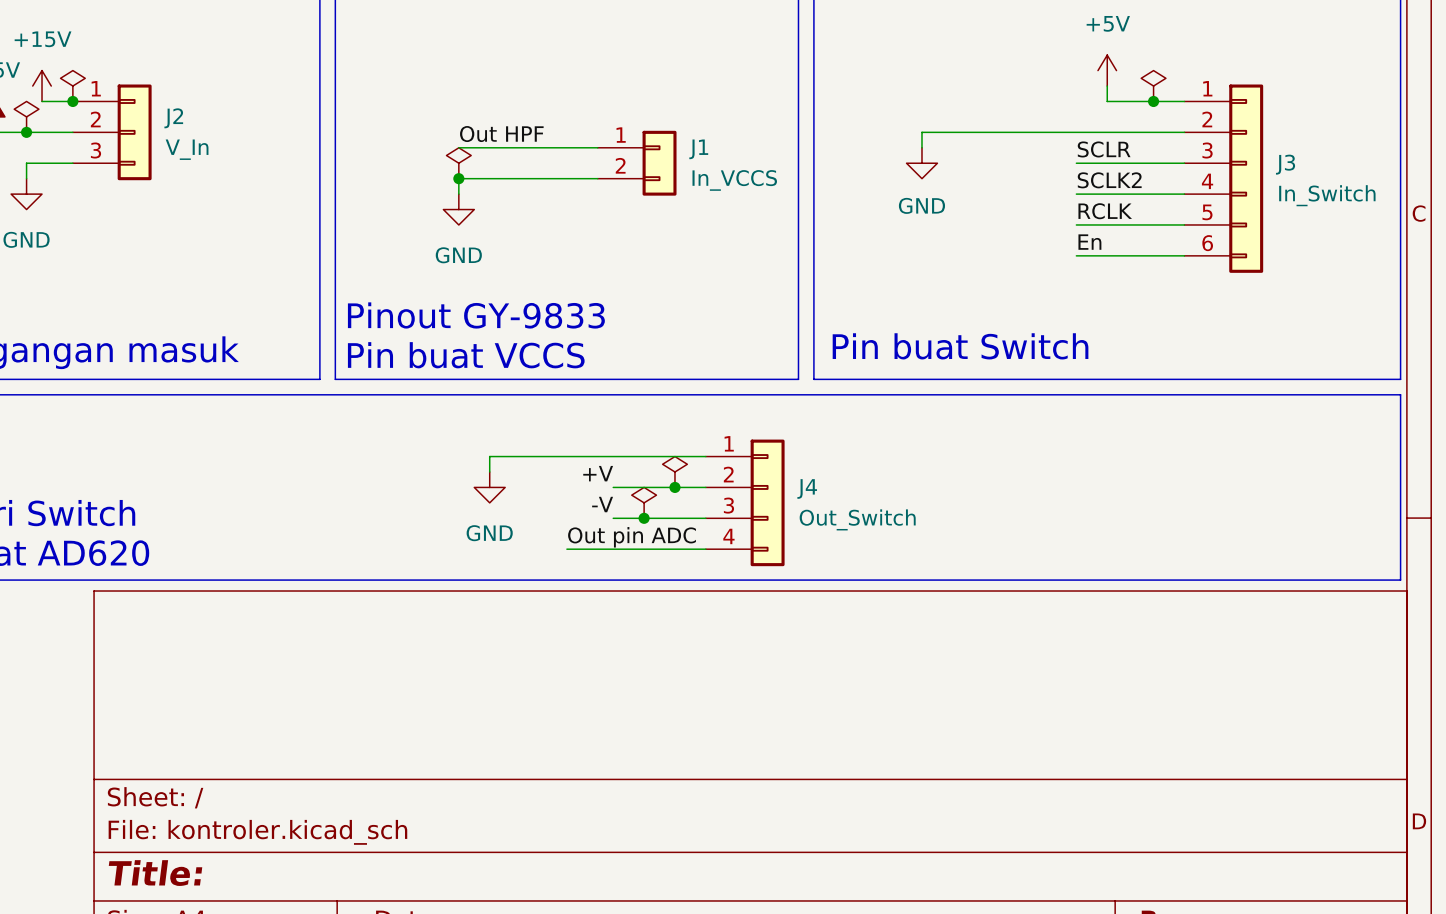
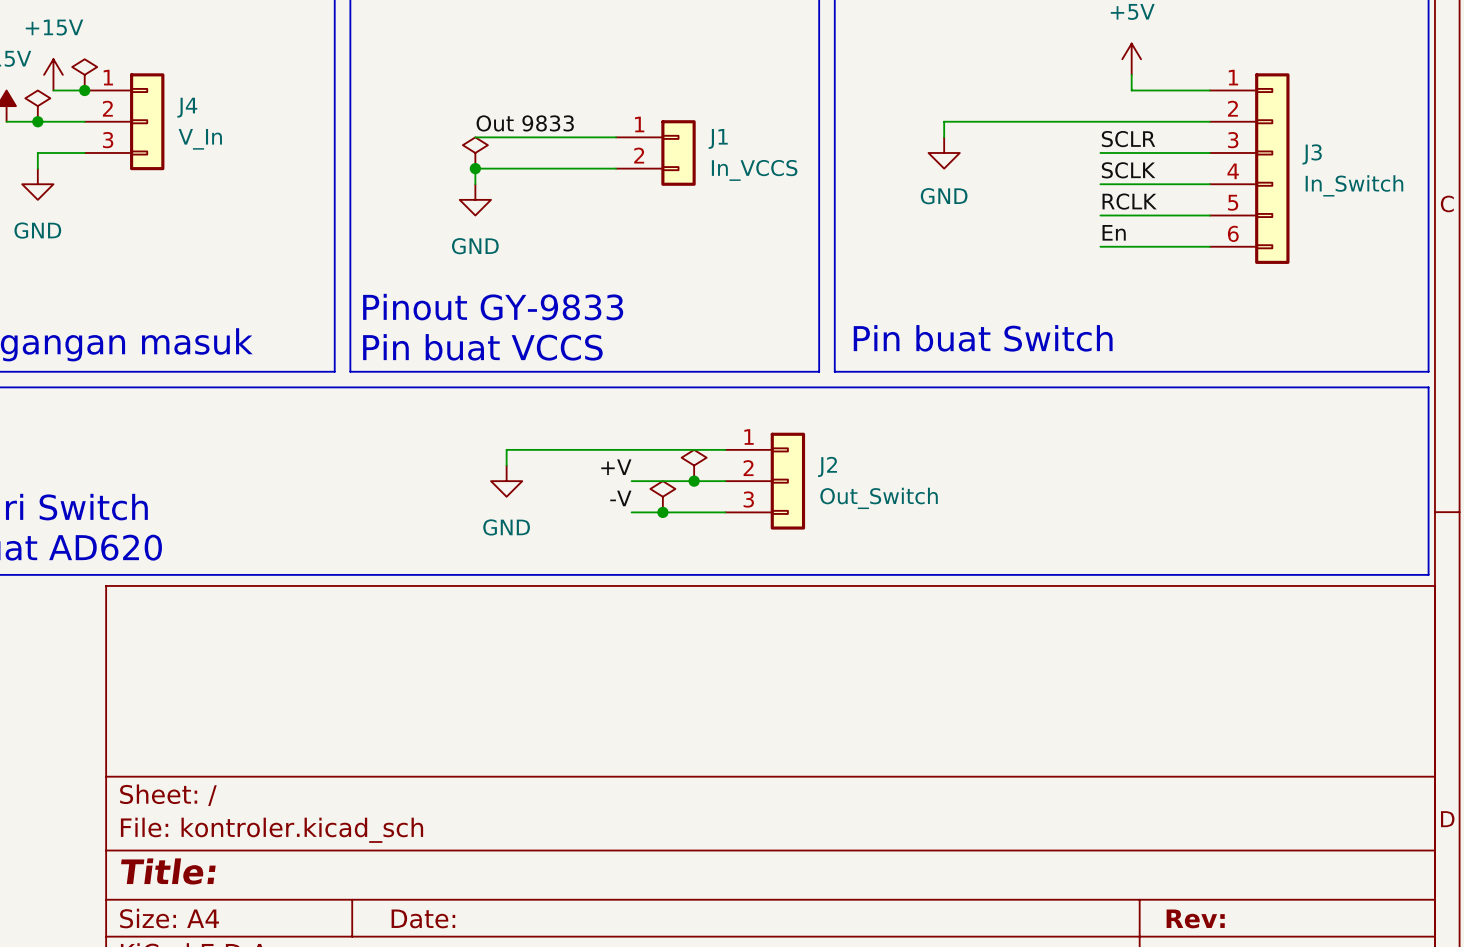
power symbol: (1153, 86) -> none
junction: (1153, 101) -> none
J2 name: J2 (173, 118) -> J4 (187, 107)
label: Out HPF (501, 134) -> Out 9833 (525, 123)
label: SCLK2 (1109, 180) -> SCLK (1128, 170)
J2: none -> Out_Switch (765, 481)
J4: Out_Switch (745, 502) -> none
label: Out pin ADC (632, 537) -> none
wire: (566, 549) (705, 549) -> none

